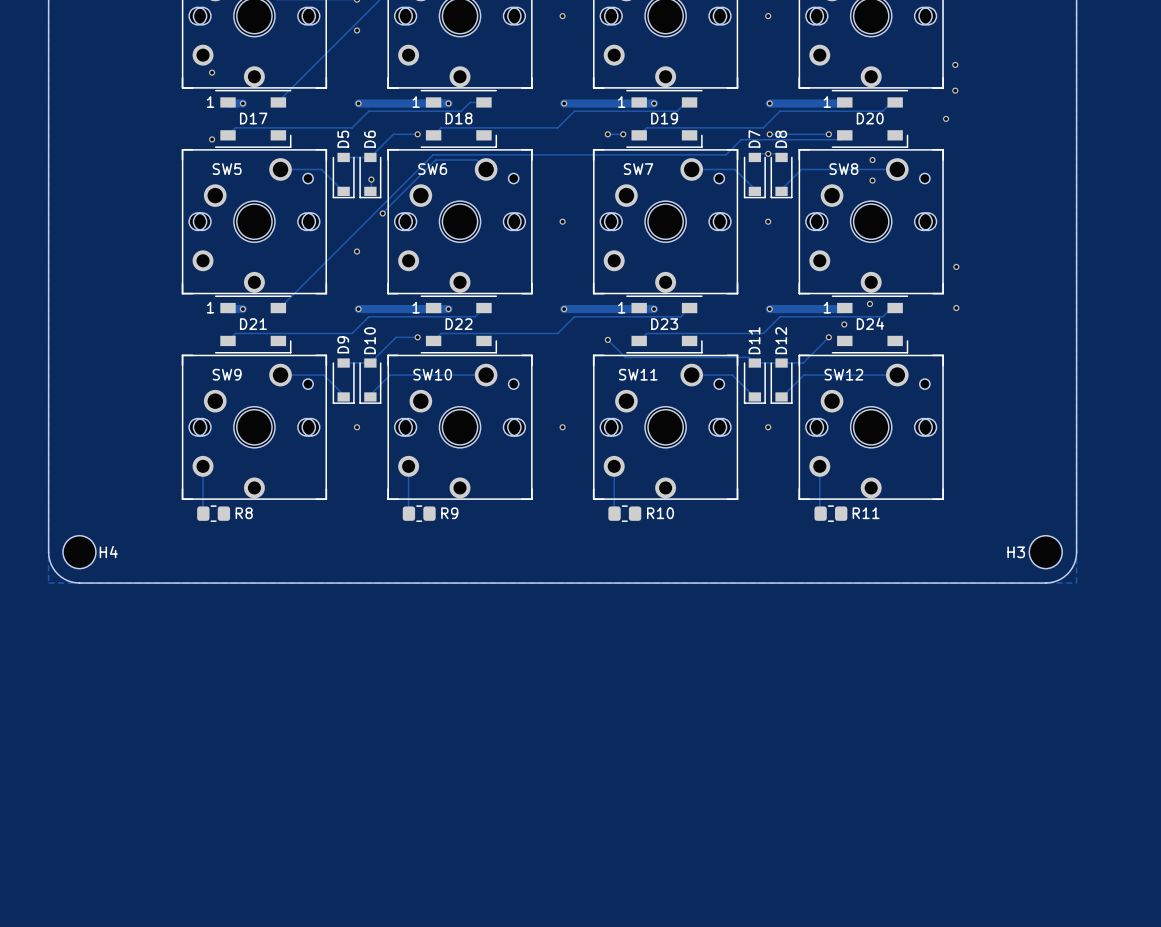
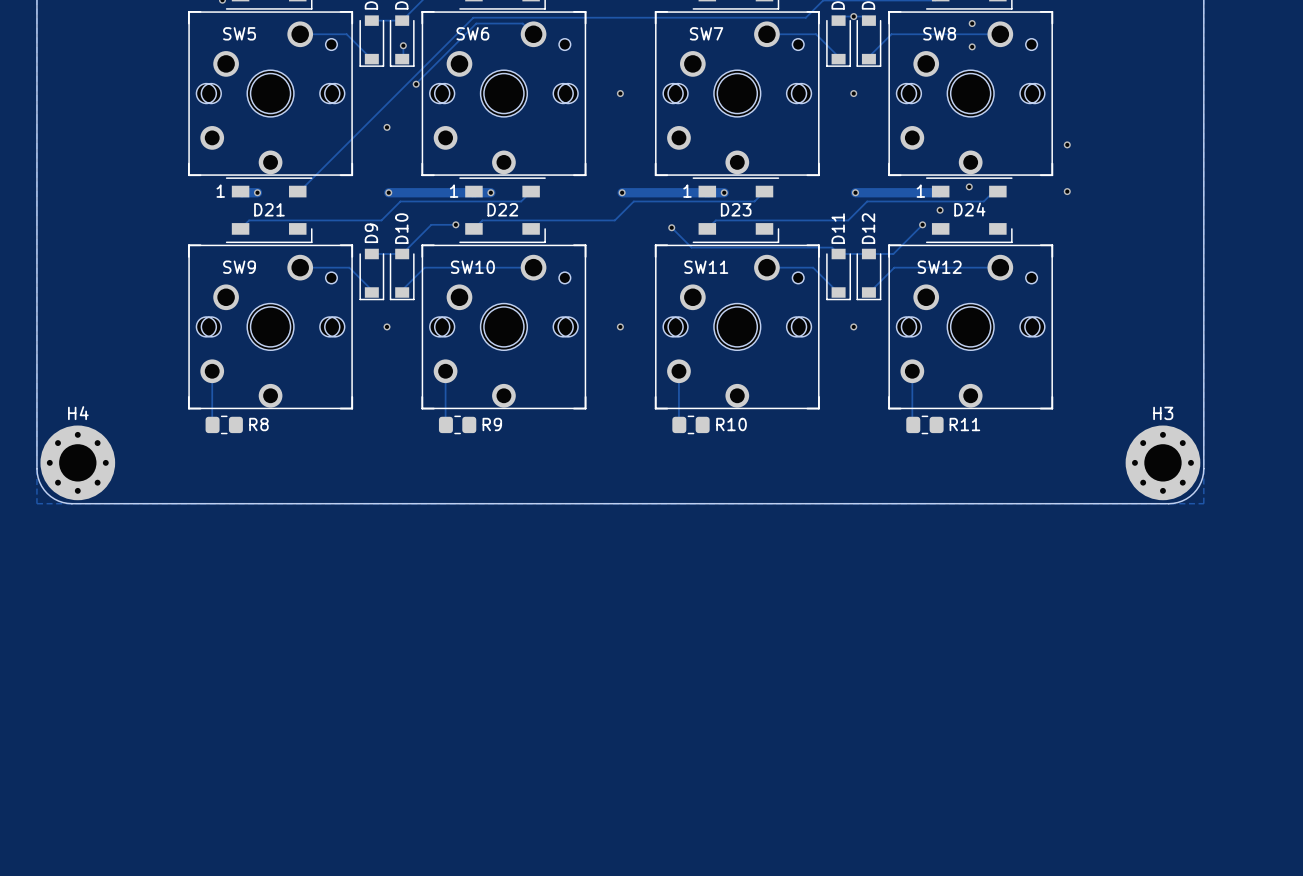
H4 footprint: [63, 535, 96, 569] -> [40, 425, 116, 501]
H3 footprint: [1029, 535, 1063, 569] -> [1125, 425, 1201, 501]
H4 name position: H4 (108, 552) -> H4 (78, 413)
H3 name position: H3 (1016, 552) -> H3 (1163, 413)

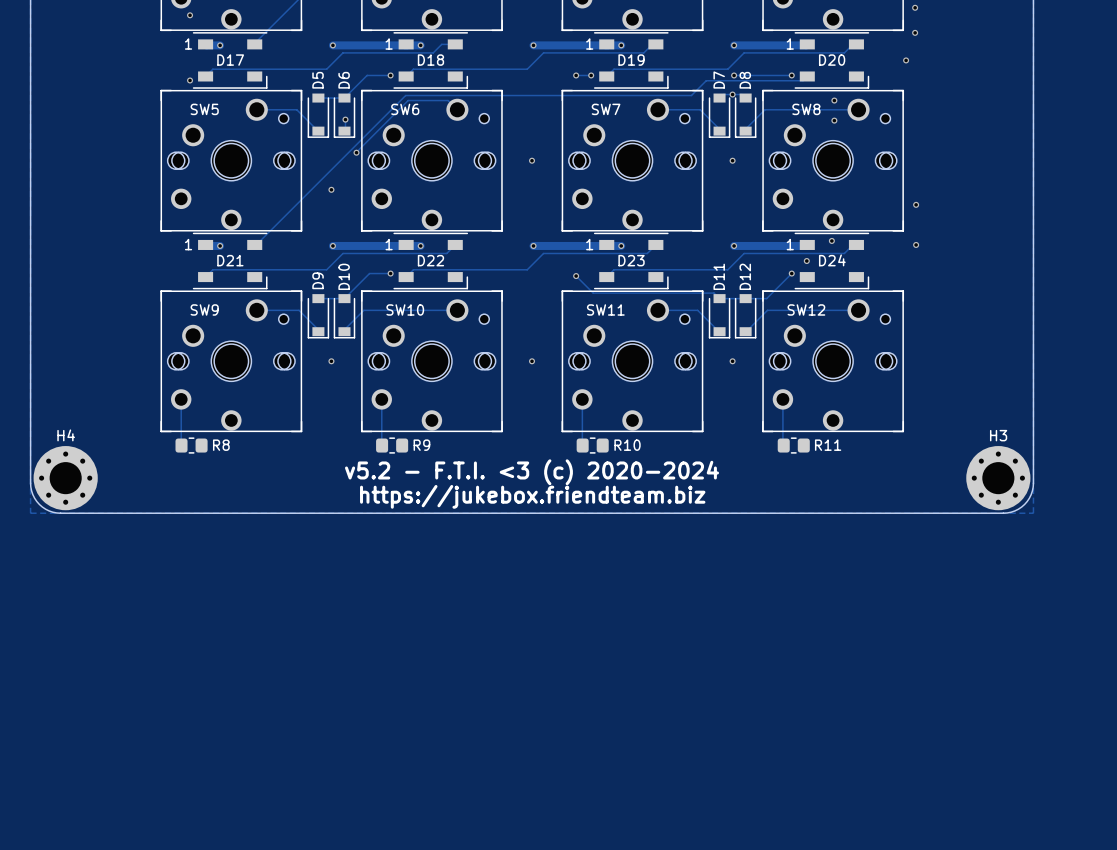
text: none -> v5.2 - F.T.I. <3 (c) 2020-2024 (532, 472)
text: none -> https://jukebox.friendteam.biz (532, 496)

